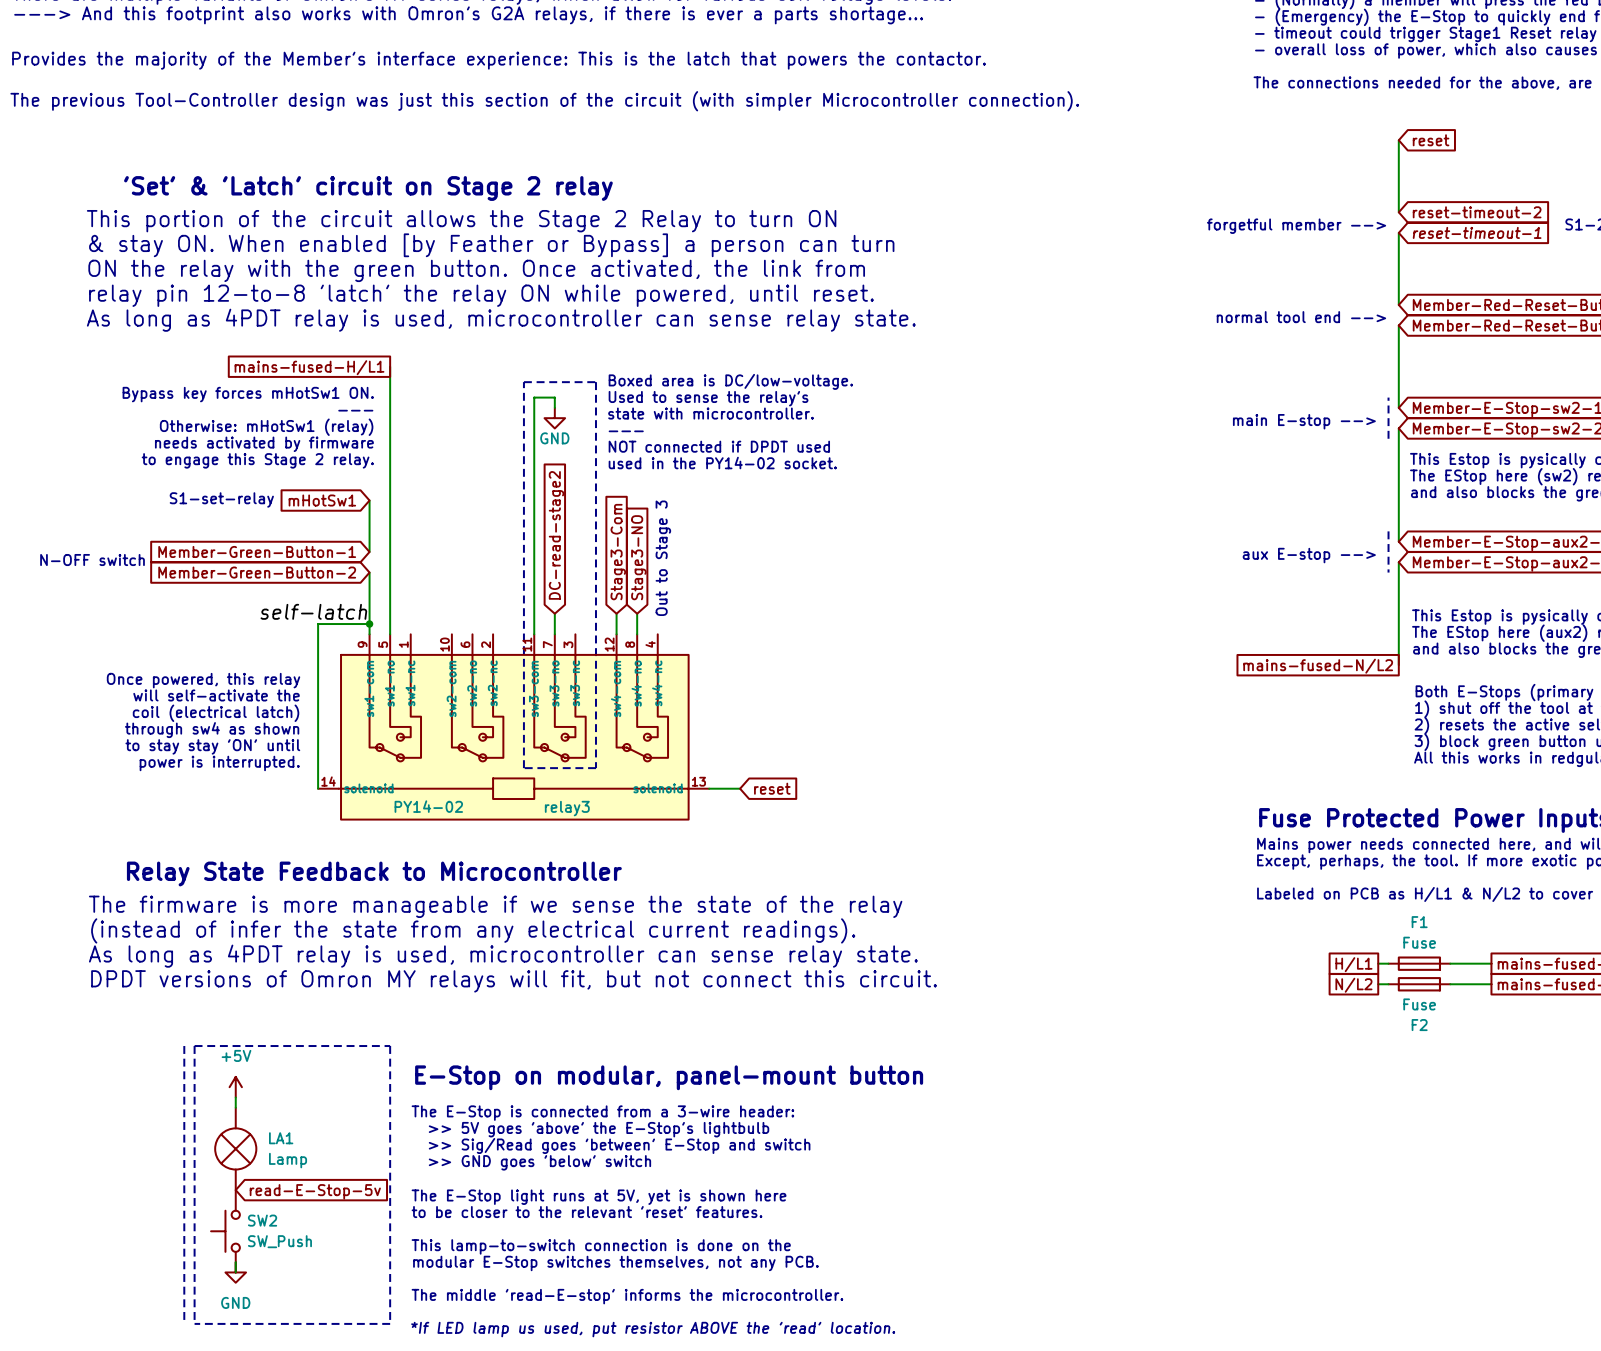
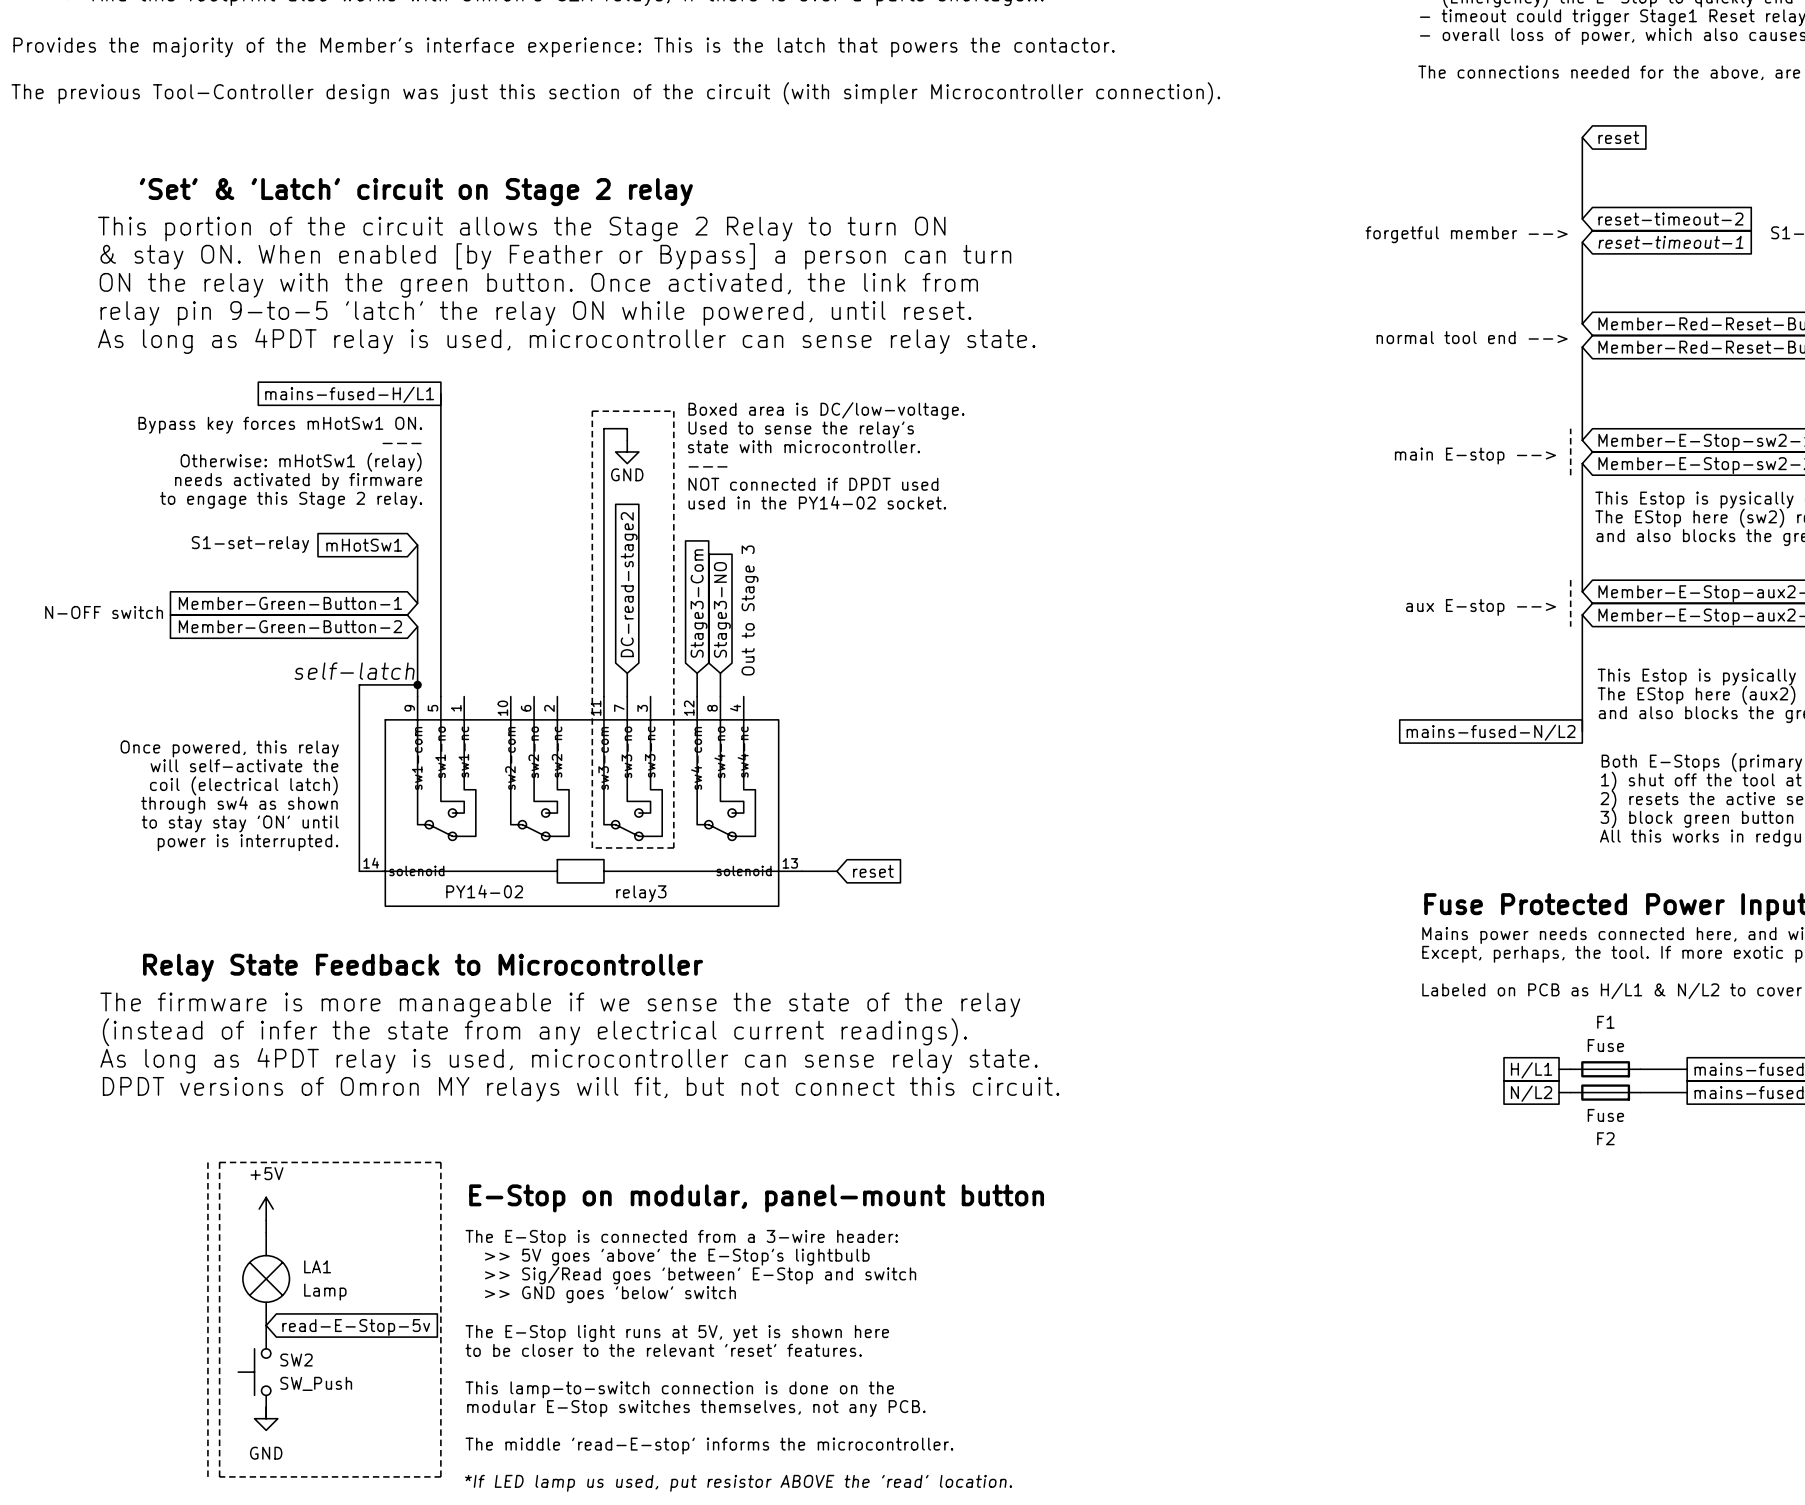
text: relay pin 12-to-8 'latch' the relay ON while powered, until reset. (481, 295) -> relay pin 9-to-5 'latch' the relay ON while powered, until reset. (535, 313)

